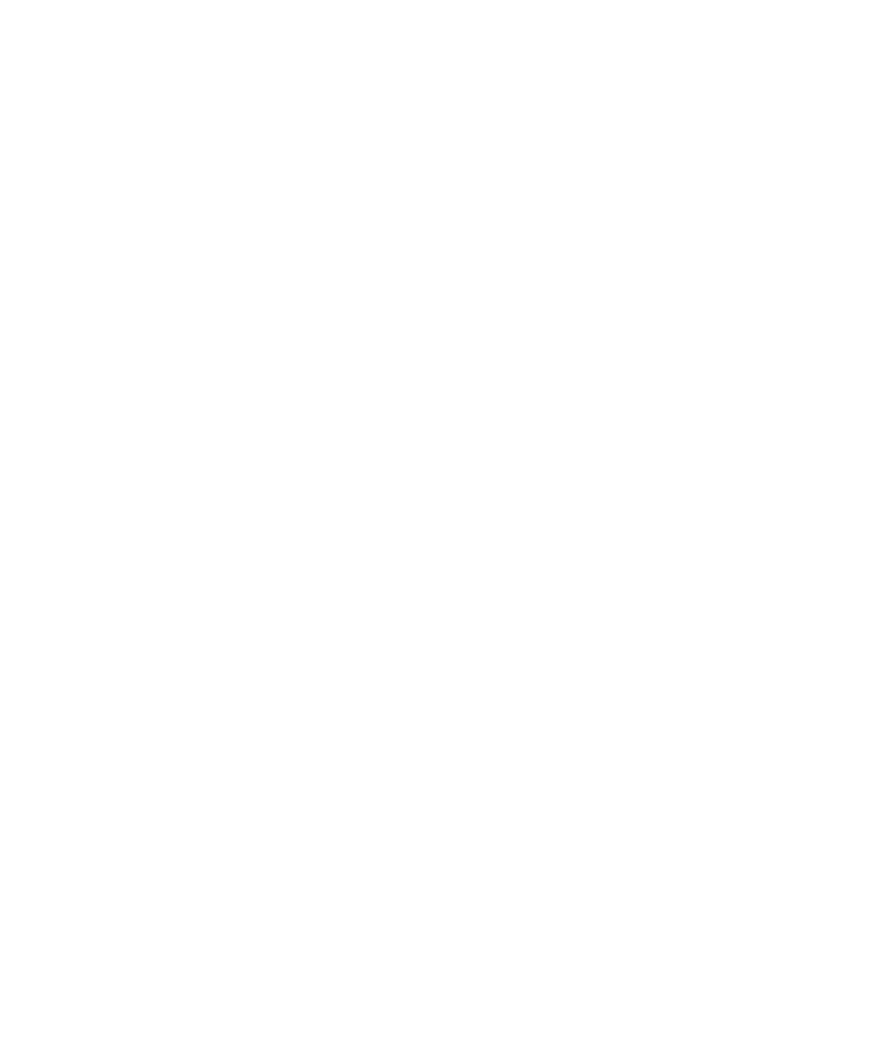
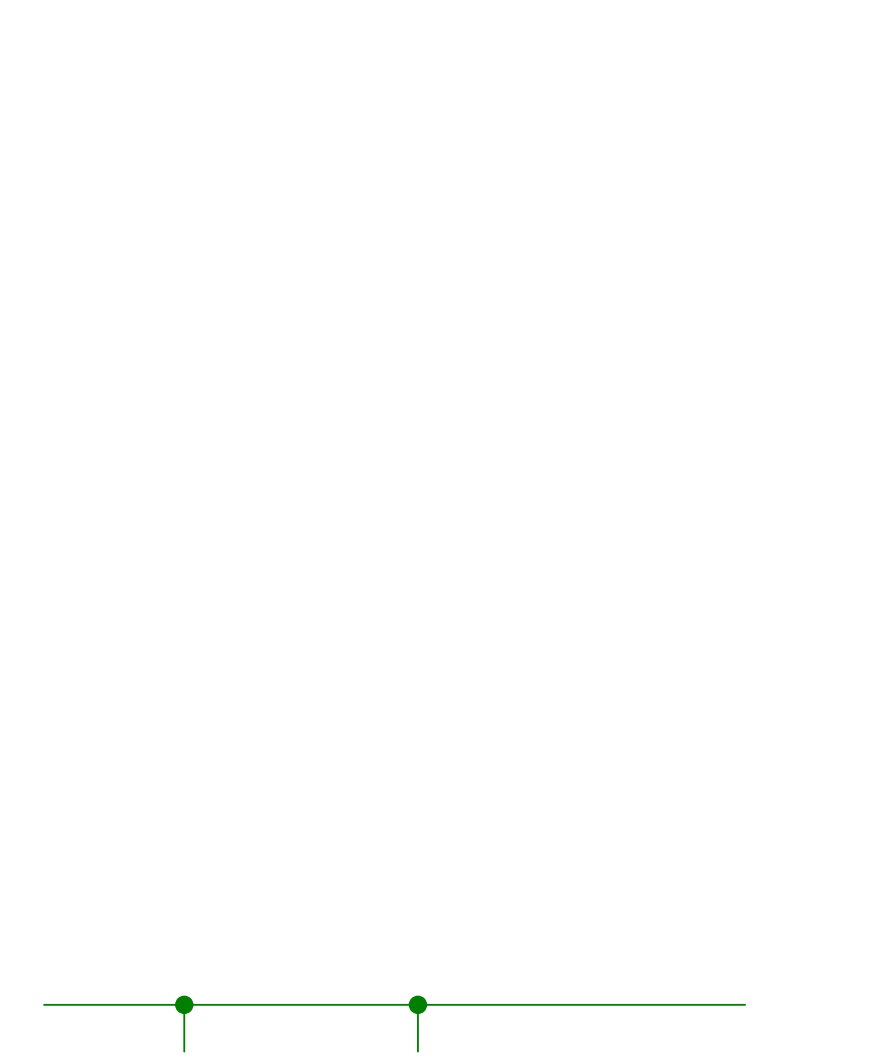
wire: none -> (44, 1004) (745, 1004)
wire: none -> (184, 1004) (184, 1051)
junction: none -> (184, 1004)
wire: none -> (417, 1004) (417, 1051)
junction: none -> (417, 1004)

